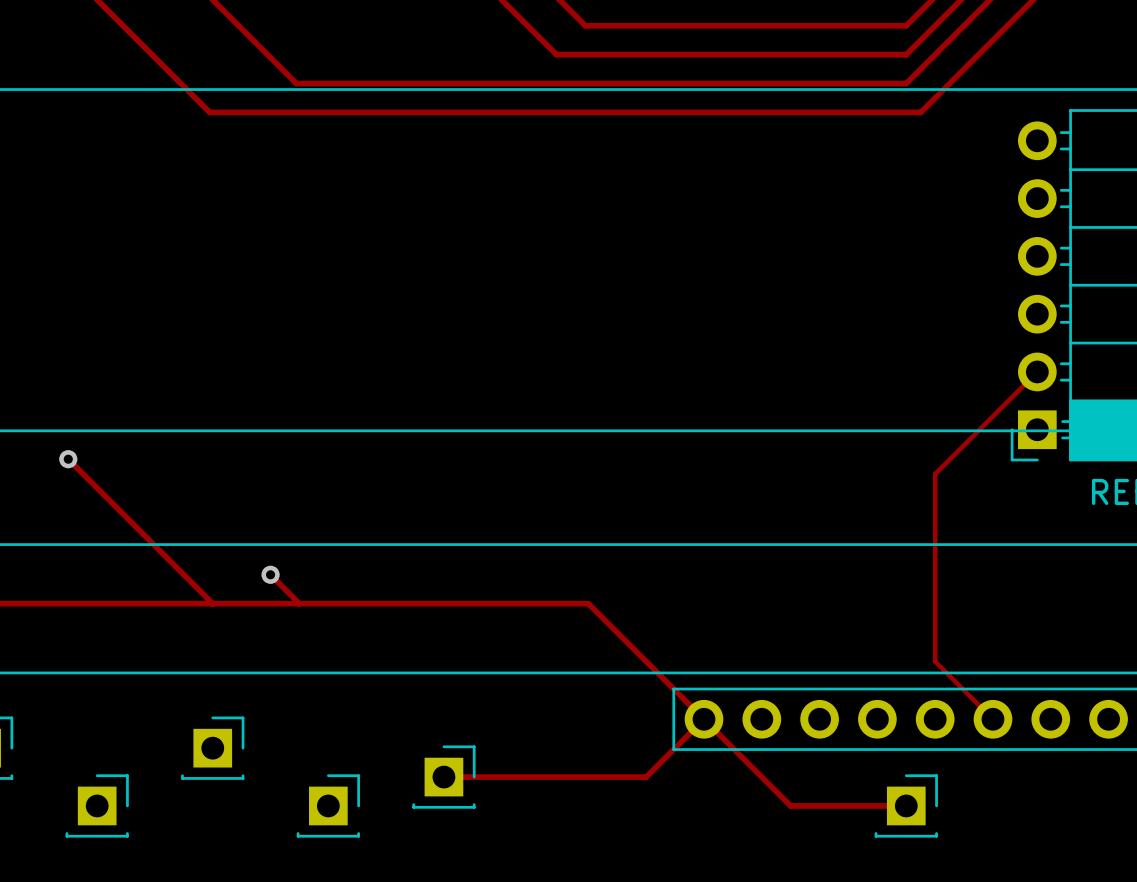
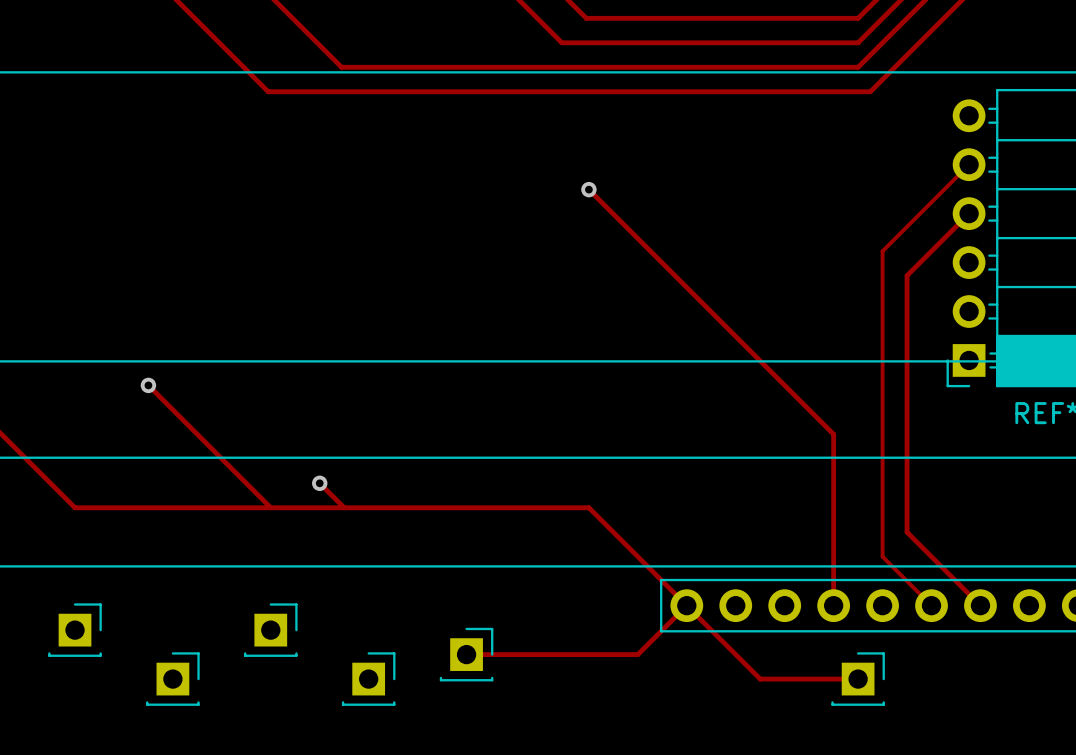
track: none -> (588, 189) (833, 434) (833, 605)
via: none -> (588, 189)
track: none -> (969, 213) (907, 275) (907, 532) (980, 605)
track: (1037, 371) (935, 474) -> (969, 164) (882, 251) (882, 398)

